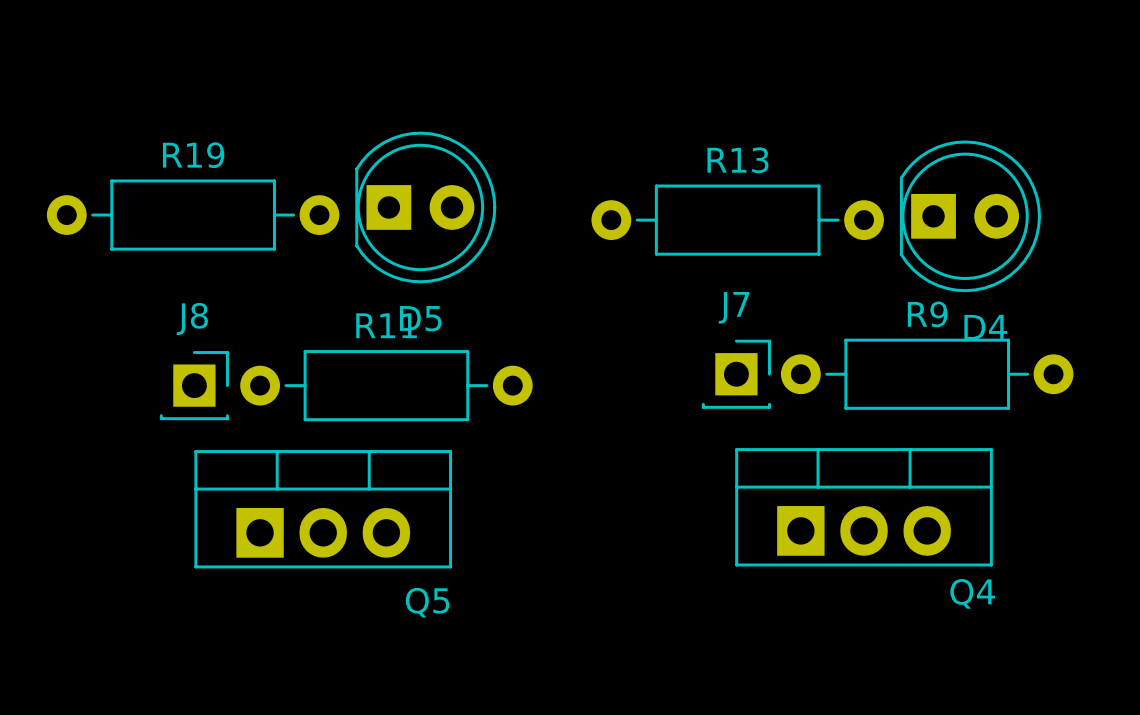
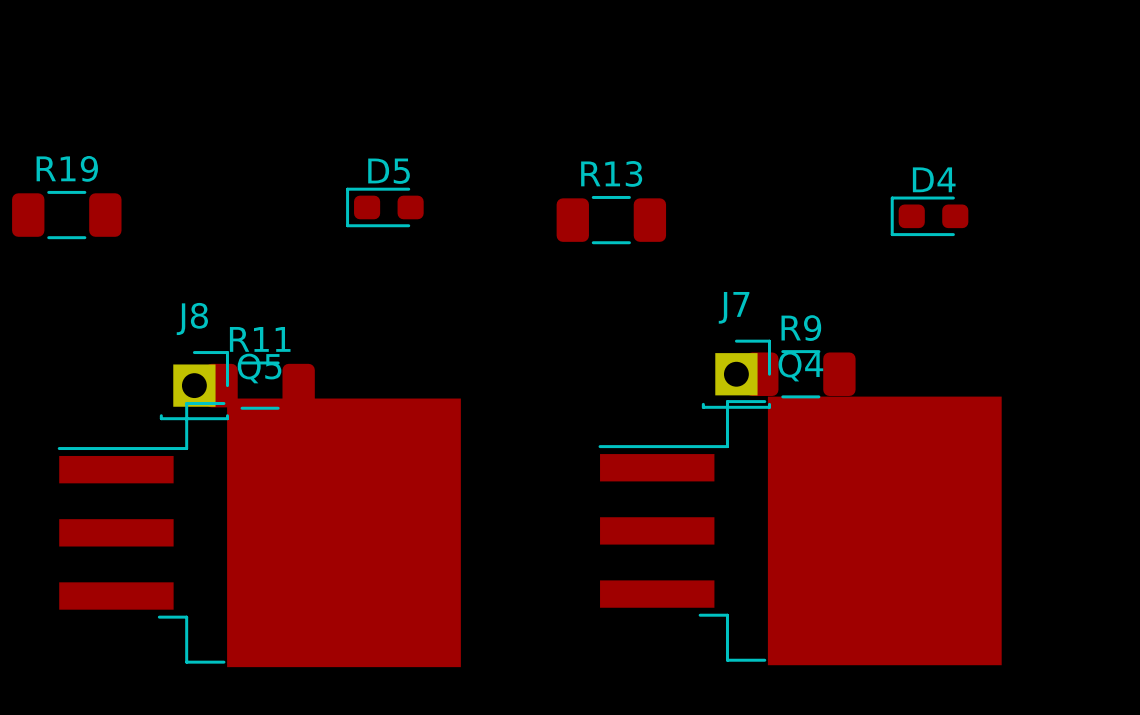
D5 footprint: [355, 131, 497, 284] -> [346, 187, 424, 228]
D4 footprint: [899, 140, 1041, 293] -> [890, 196, 969, 237]
R19 footprint: [46, 179, 340, 251] -> [12, 190, 122, 240]
R13 footprint: [591, 184, 884, 256] -> [556, 195, 667, 245]
D5 name position: D5 (420, 318) -> D5 (389, 171)
D4 name position: D4 (985, 327) -> D4 (934, 179)
R9 footprint: [780, 338, 1074, 410] -> [746, 350, 856, 399]
R11 footprint: [240, 350, 533, 422] -> [205, 361, 315, 410]
Q4 footprint: [735, 448, 993, 567] -> [598, 396, 1002, 666]
Q5 footprint: [194, 450, 453, 569] -> [57, 398, 461, 668]
Q4 name position: Q4 (972, 593) -> Q4 (800, 366)
Q5 name position: Q5 (427, 602) -> Q5 (259, 368)

